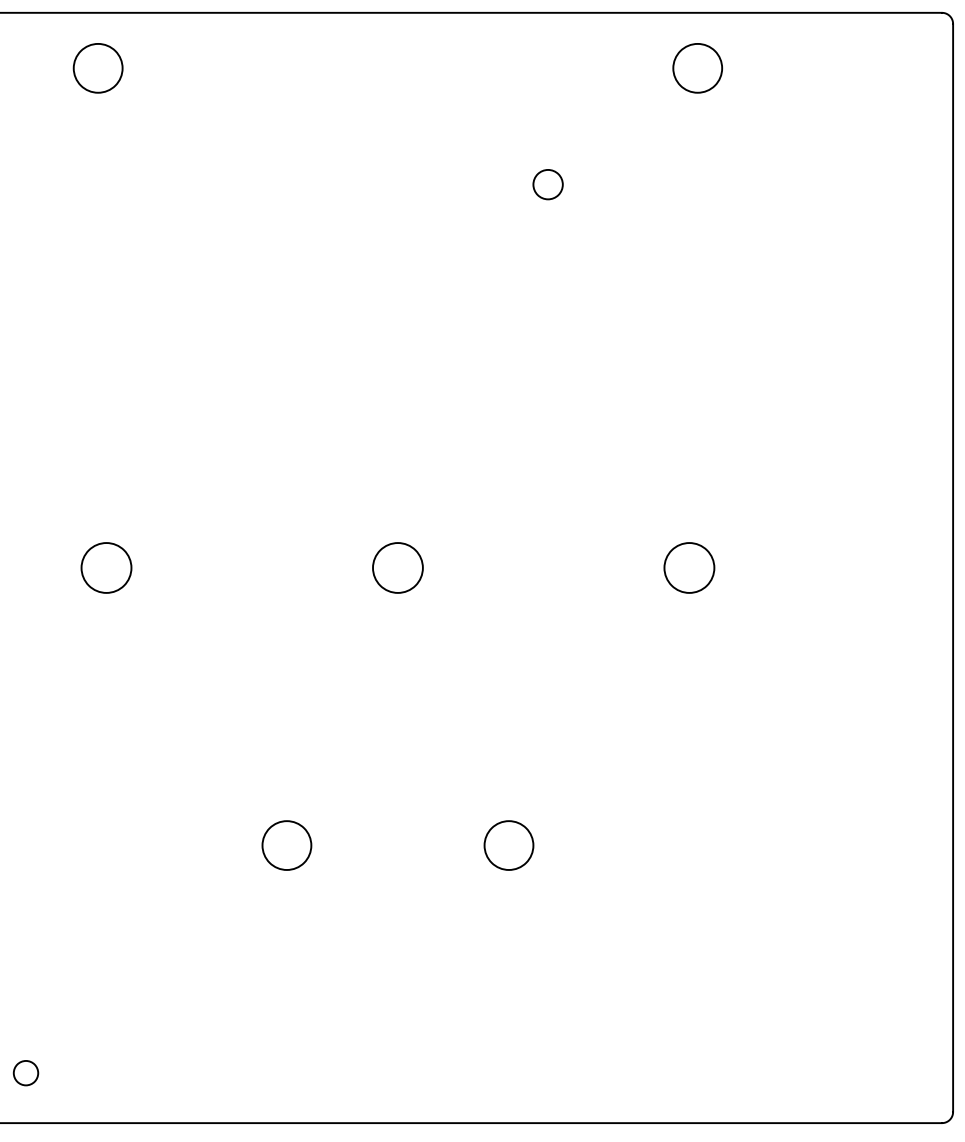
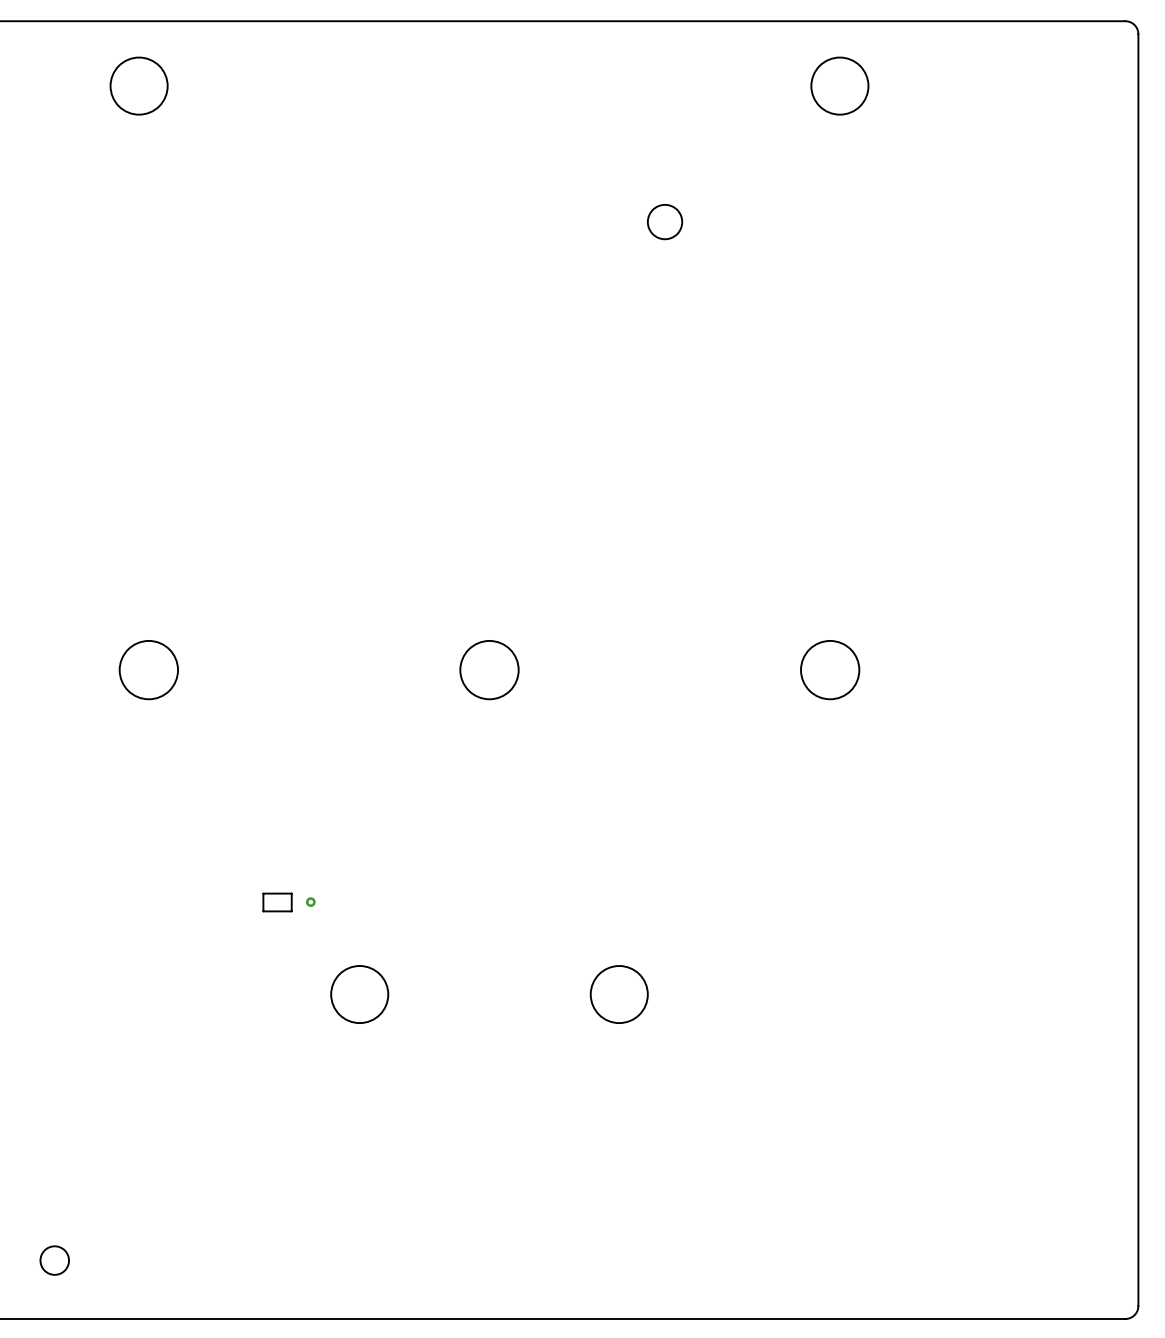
board edge: none -> (291, 893) (291, 911) (263, 911) (263, 893) (291, 893)
via: none -> (310, 902)

